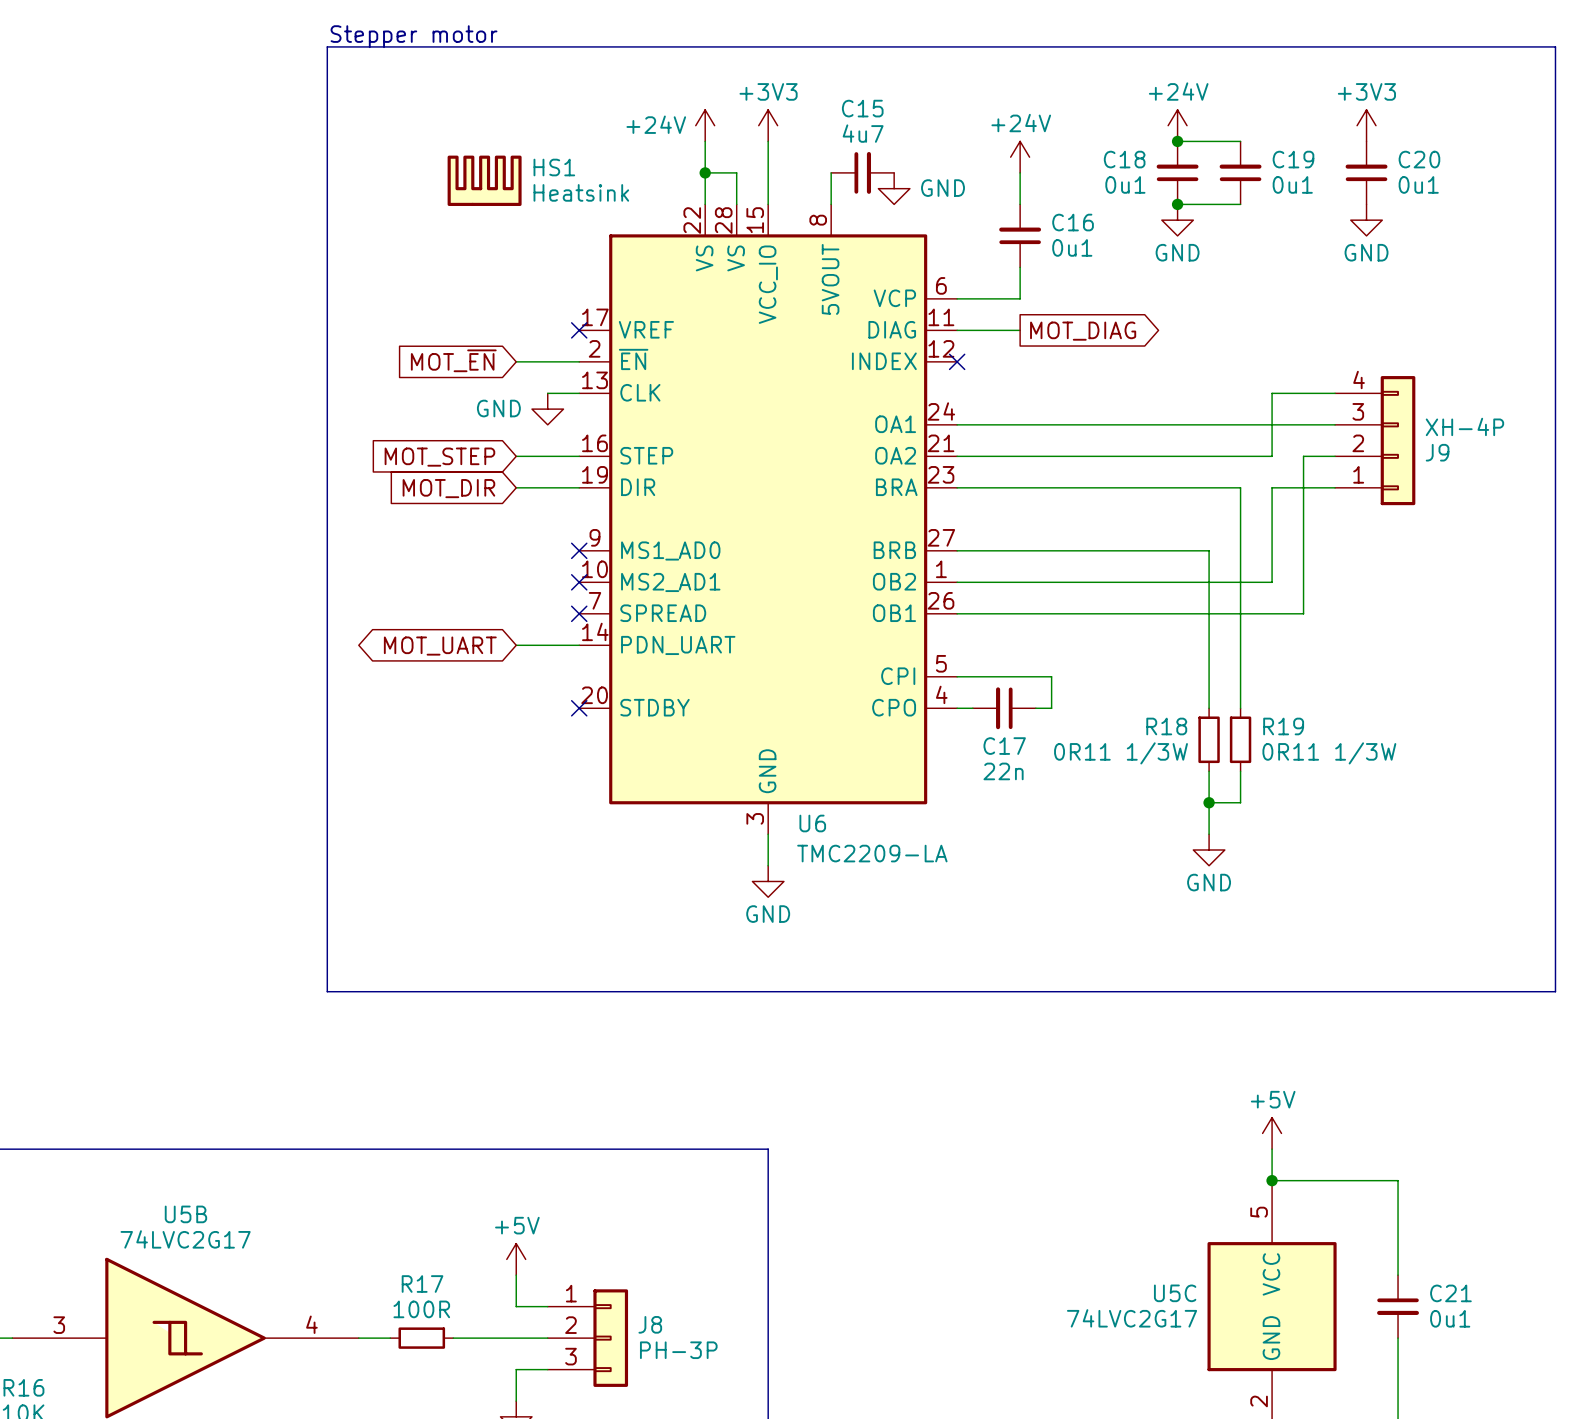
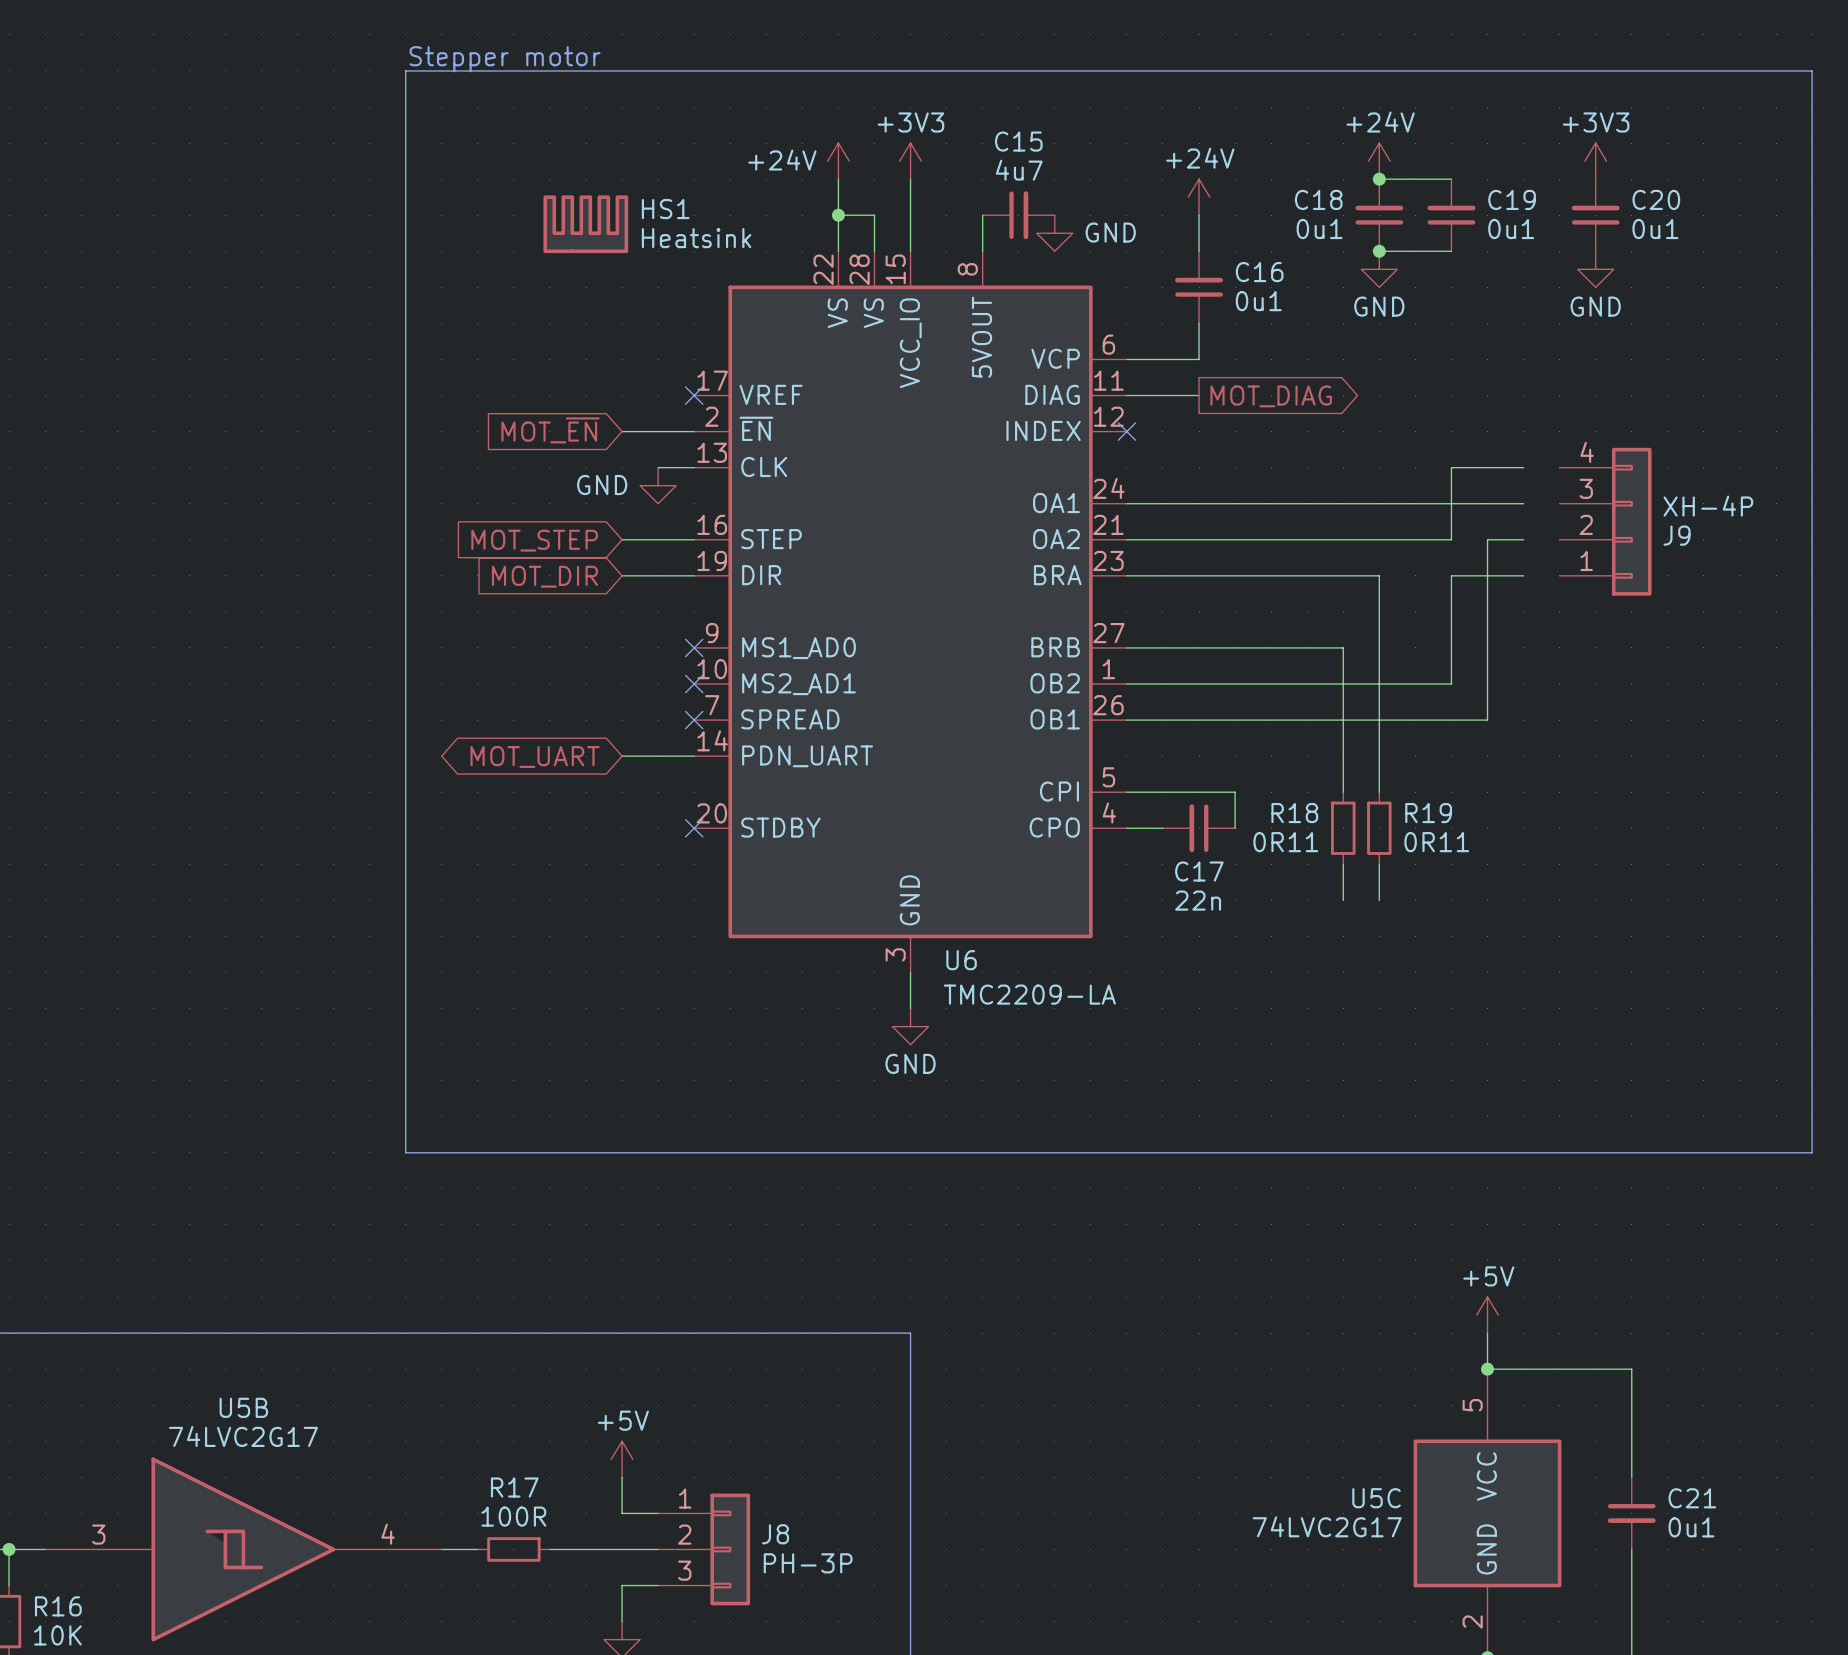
wire: (1272, 393) (1272, 456) (1240, 456) -> (1487, 467) (1451, 467) (1451, 539)
wire: (1303, 393) (1335, 393) -> none
wire: (1303, 424) (1335, 424) -> none
wire: (1335, 456) (1303, 456) (1303, 613) (1272, 613) -> none
wire: (1177, 487) (1240, 487) -> (1523, 539) (1487, 539) (1487, 575) (1451, 575)
wire: none -> (1379, 575) (1379, 792)
wire: (1303, 487) (1335, 487) -> none
wire: (1146, 550) (1209, 550) (1209, 708) -> (1343, 647) (1343, 792)
wire: (1272, 582) (1240, 582) (1240, 708) -> (1487, 684) (1487, 720)
C17 position: (1004, 708) -> (1199, 828)
wire: none -> (1343, 864) (1343, 900)
wire: none -> (1379, 864) (1379, 900)
R18 position: (1209, 739) -> (1343, 828)
R19 position: (1240, 739) -> (1379, 828)
R18 value: 0R11 1/3W (1121, 753) -> 0R11 (1285, 842)
R19 value: 0R11 1/3W (1329, 753) -> 0R11 (1436, 842)
wire: (1209, 771) (1209, 834) -> none
wire: (1240, 771) (1240, 802) (1209, 802) -> none
junction: (1209, 802) -> none
power symbol: GND (1209, 849) -> none

